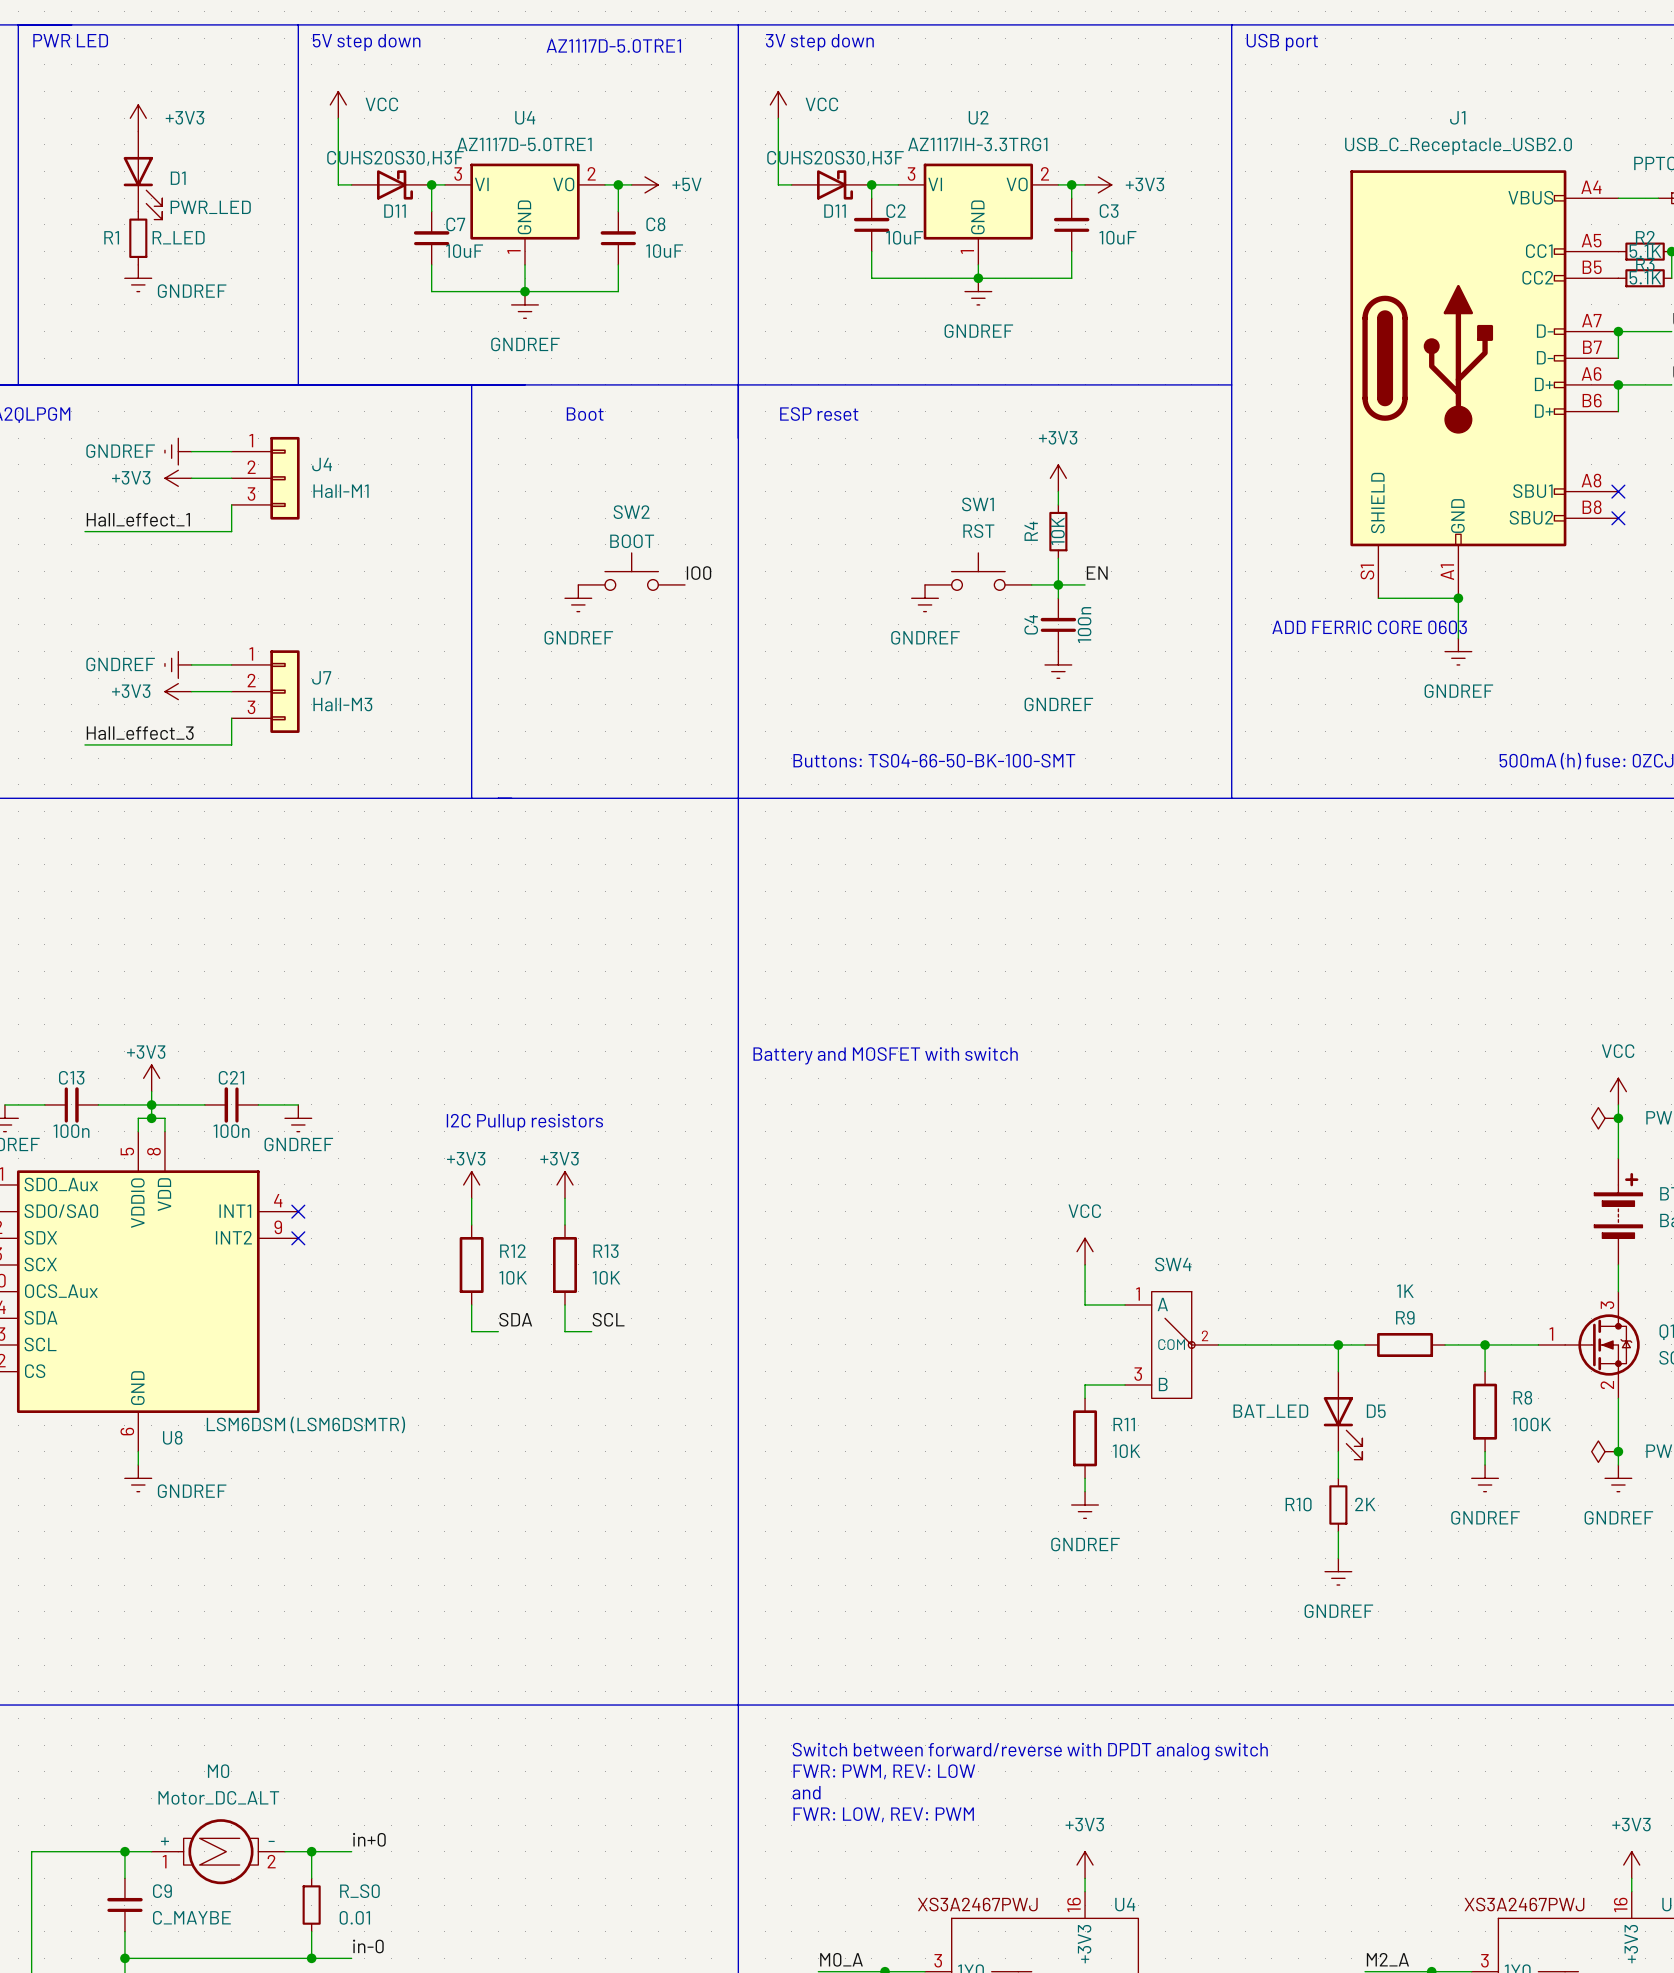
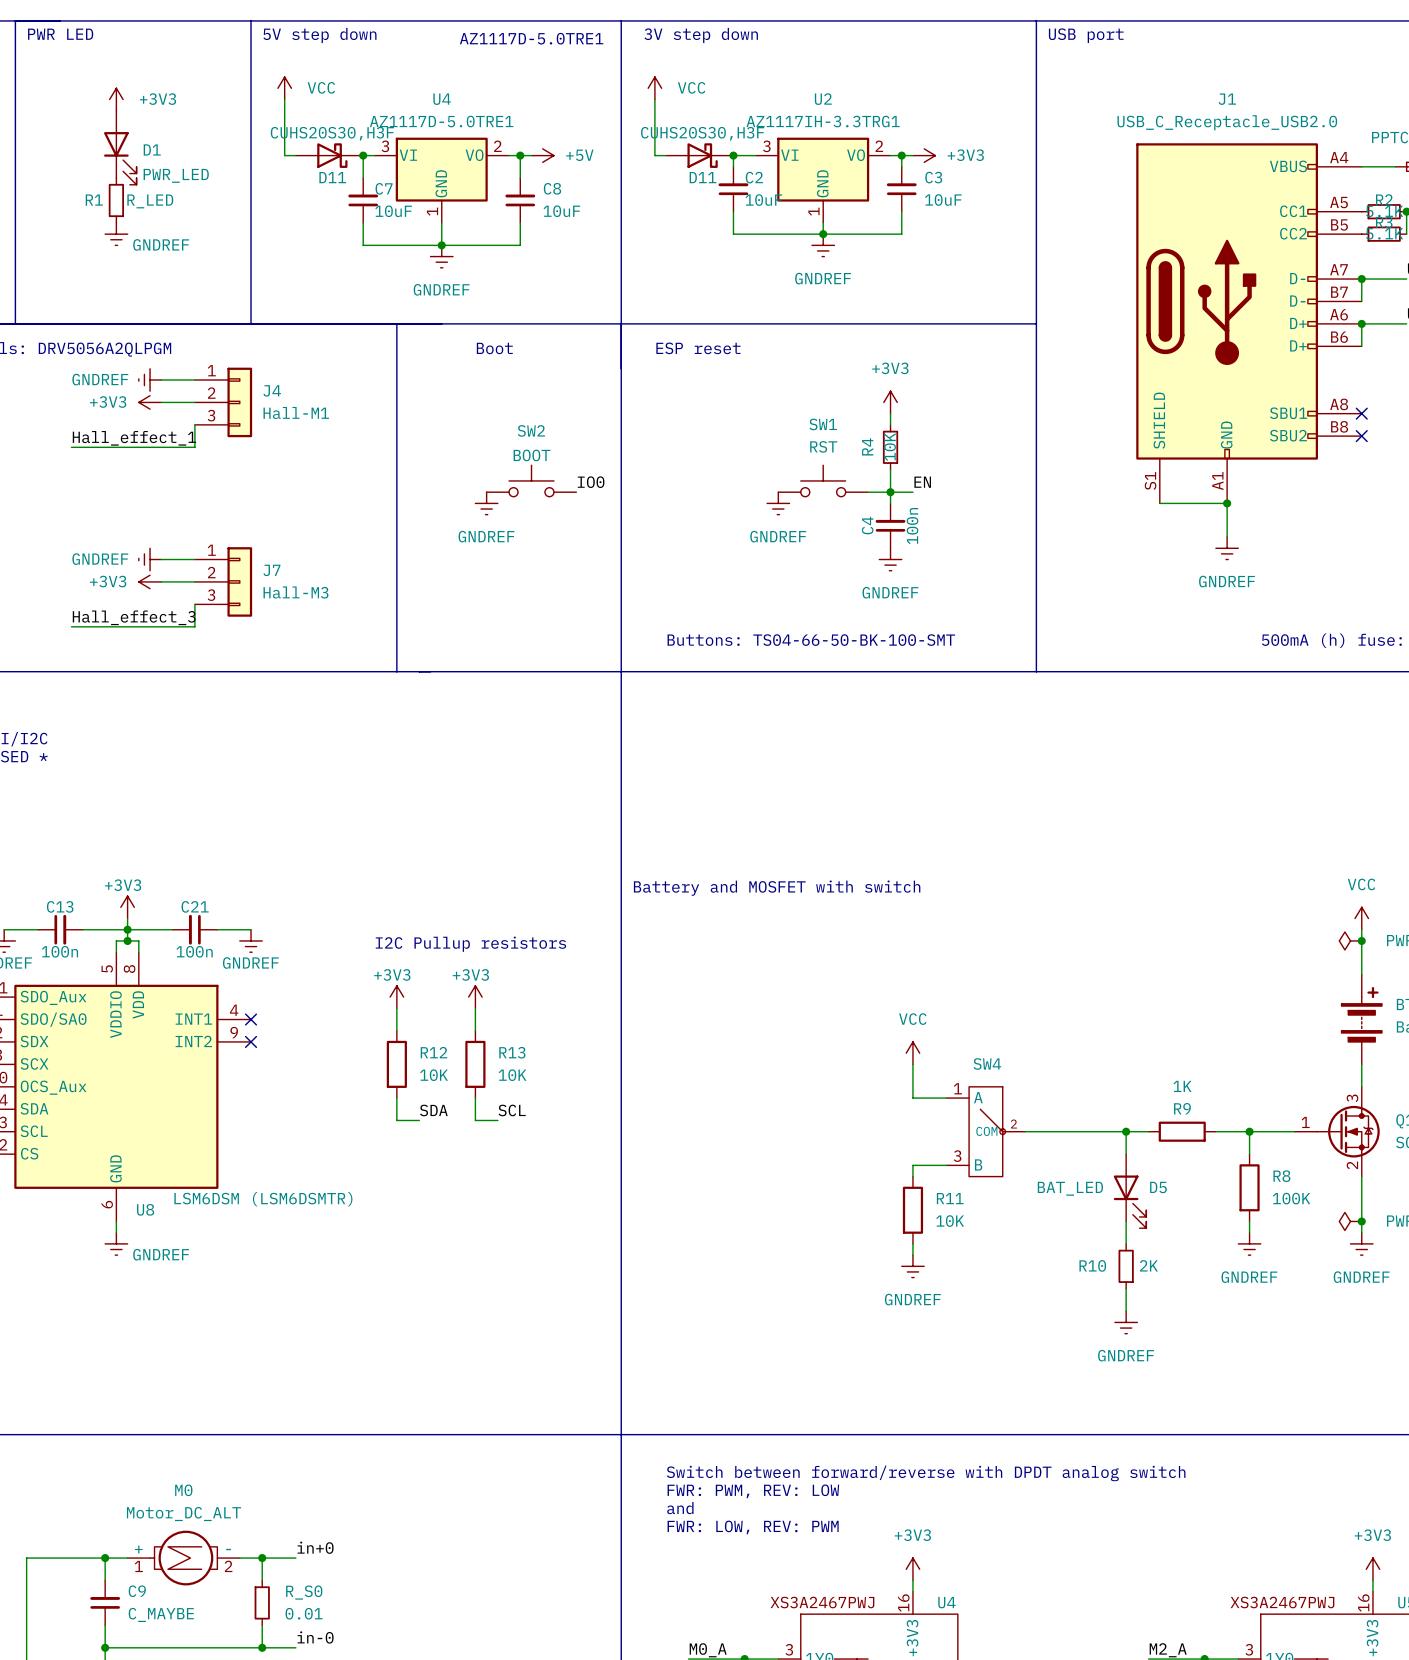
text: ADD FERRIC CORE 0603 (1369, 627) -> none

